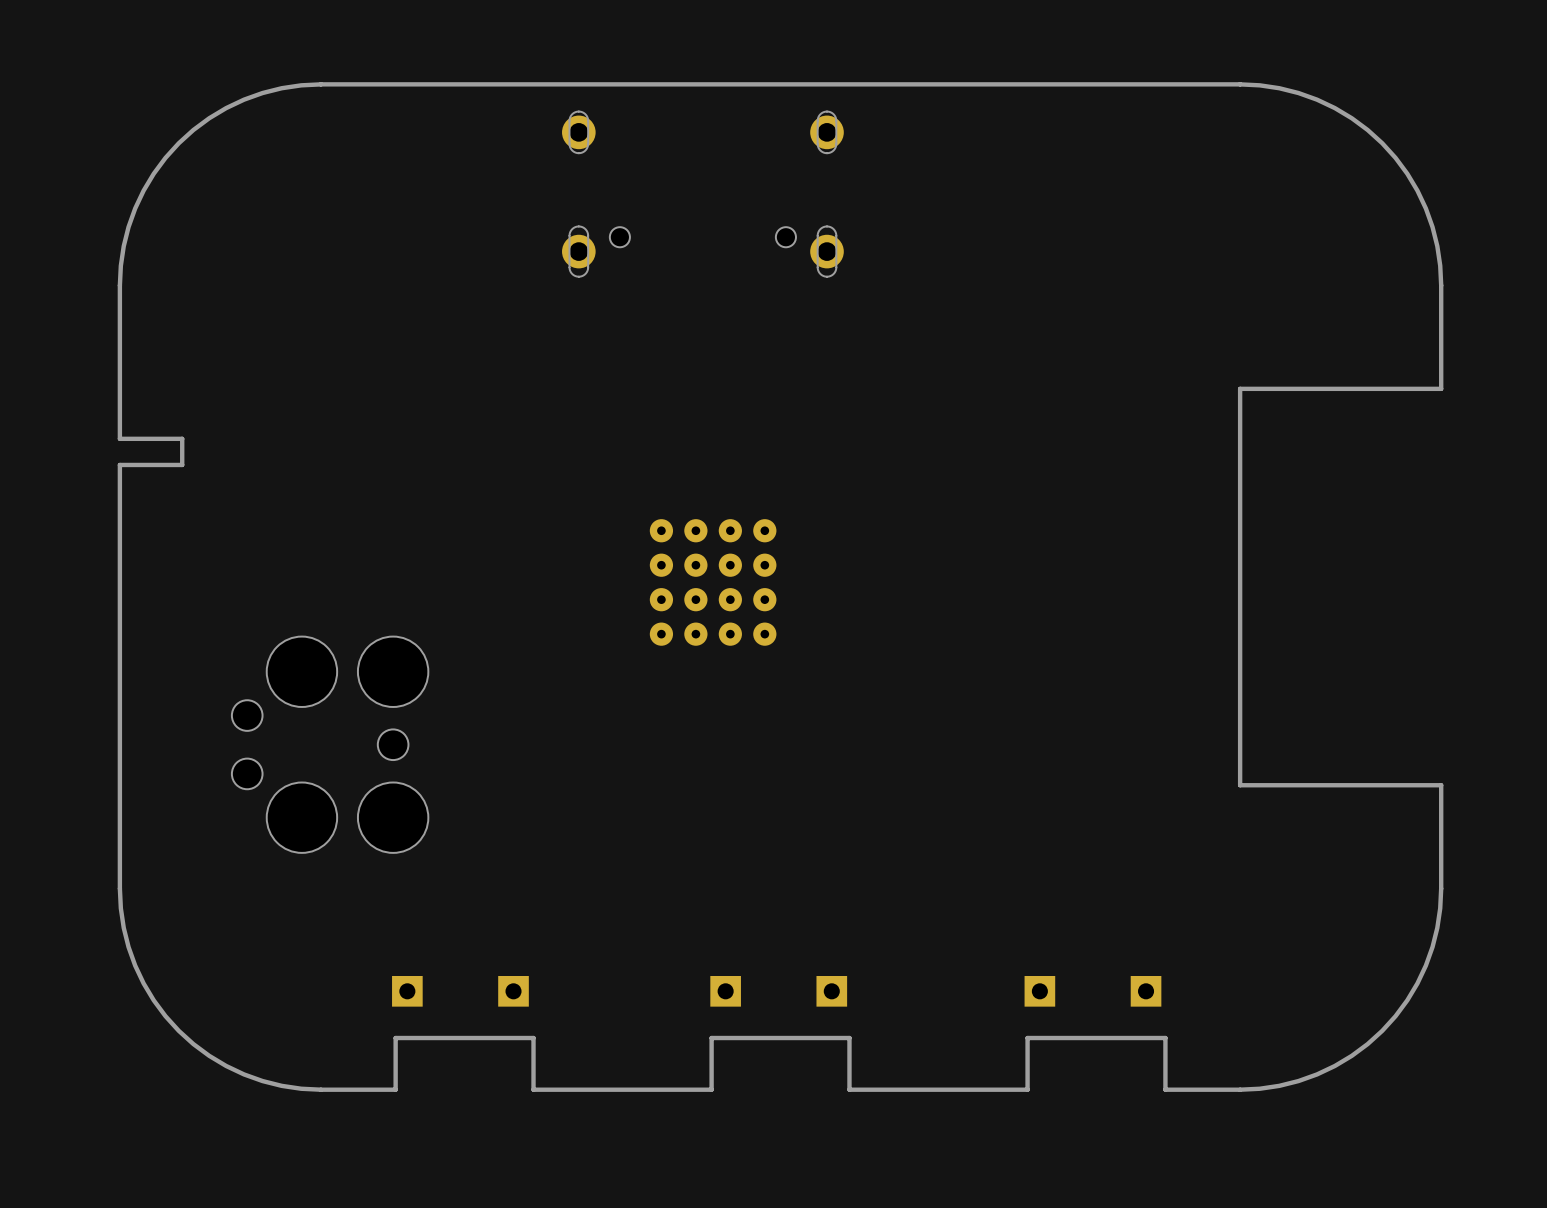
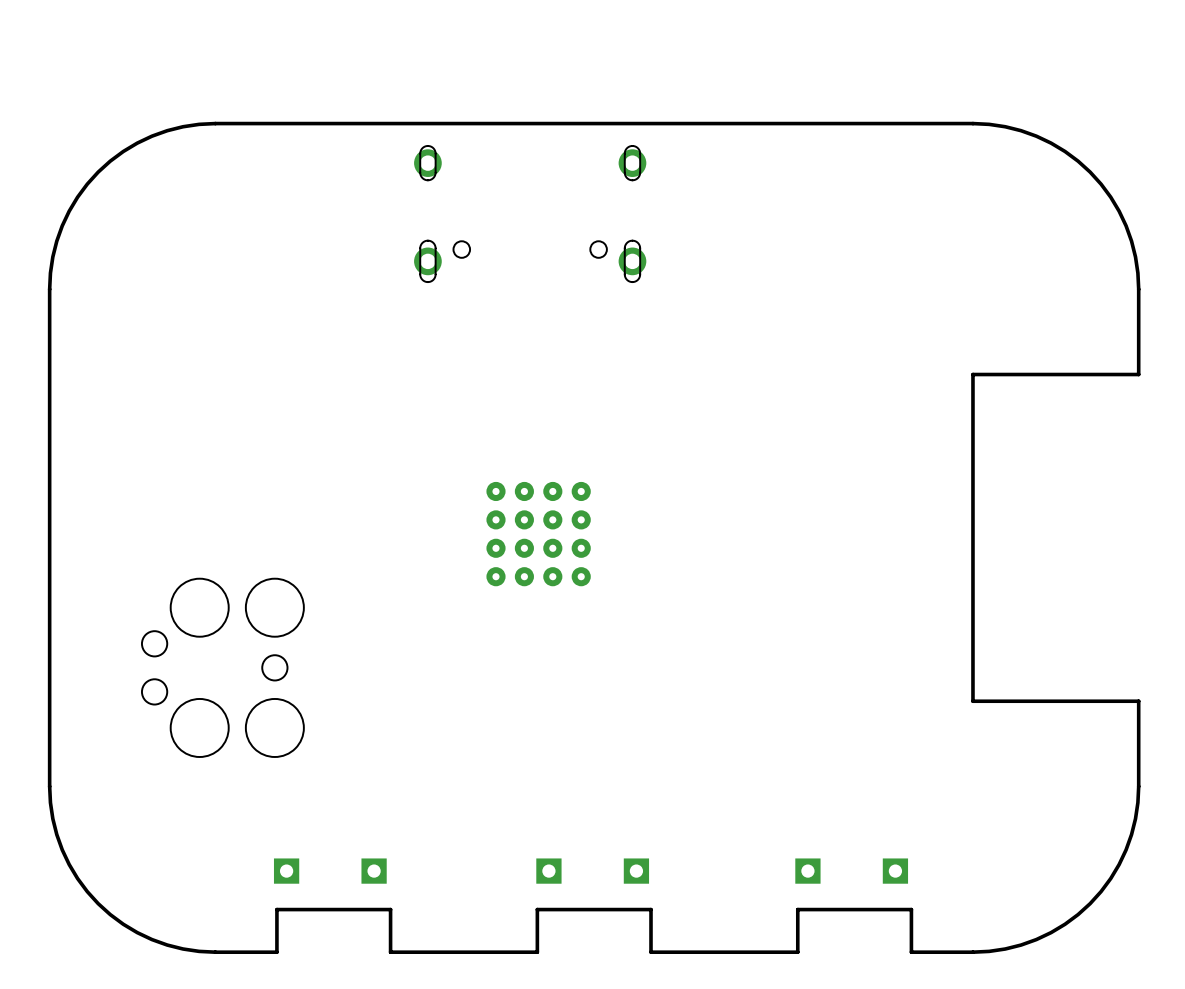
board edge: (119, 438) (182, 438) (182, 464) (119, 464) -> (49, 415) (49, 437)

